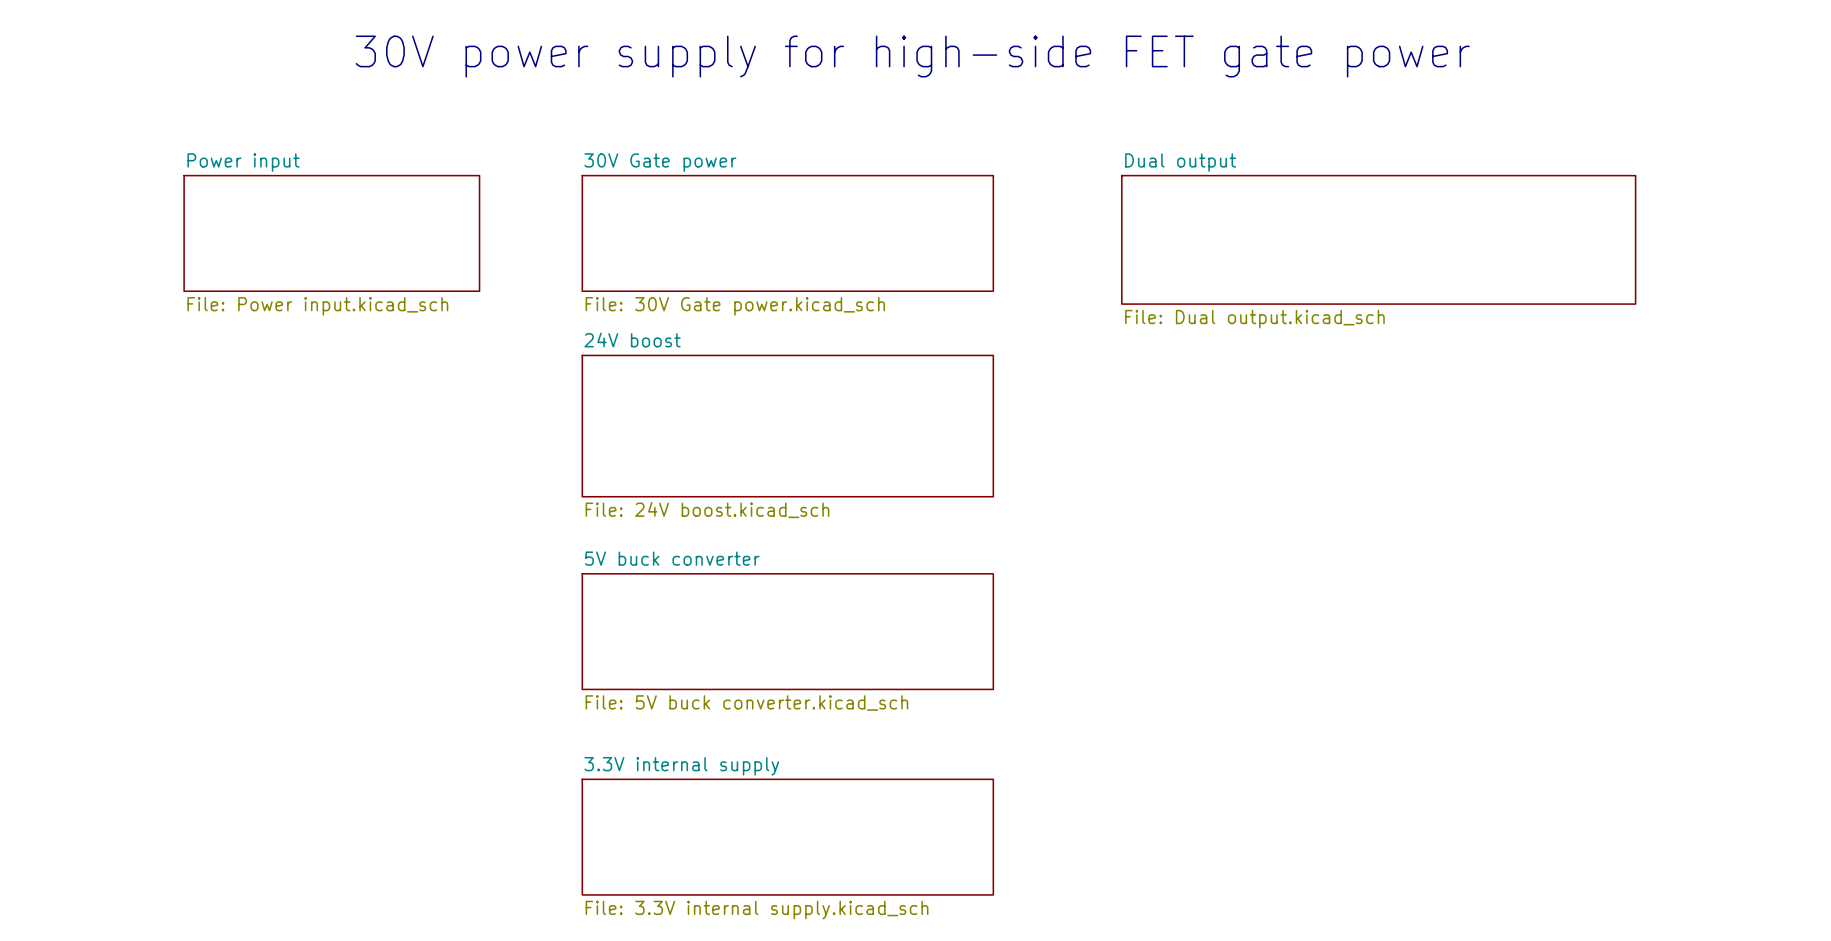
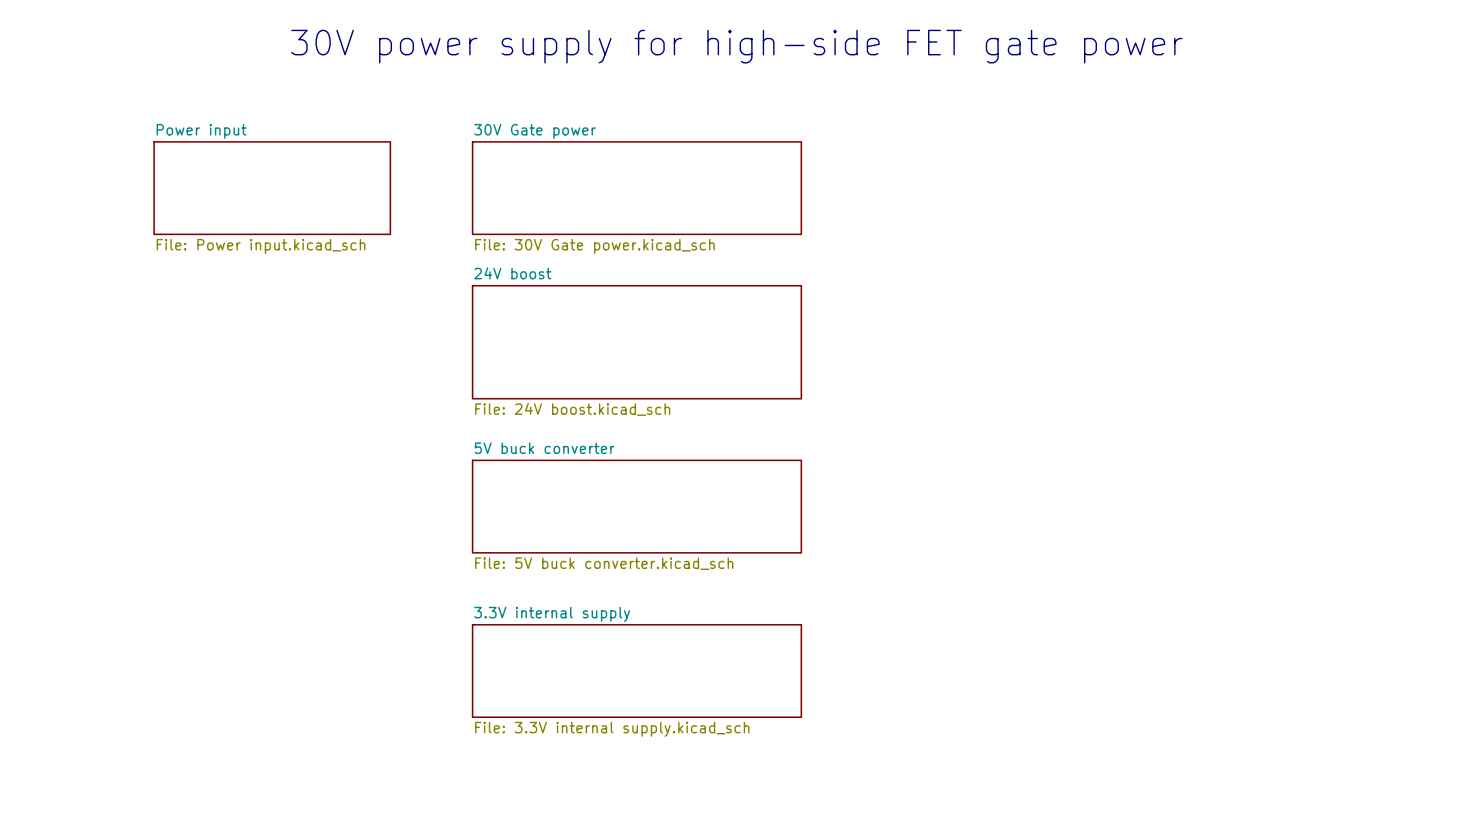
sheet Dual output: File: Dual output.kicad_sch (1378, 239) -> none

